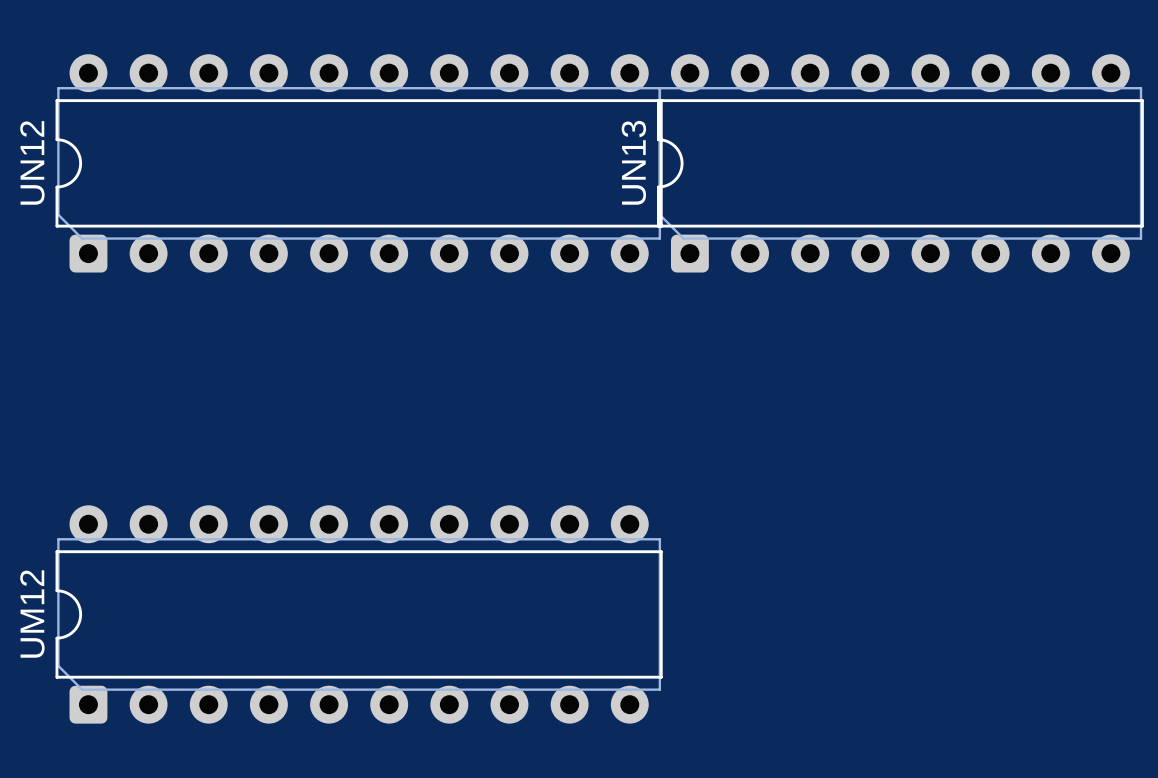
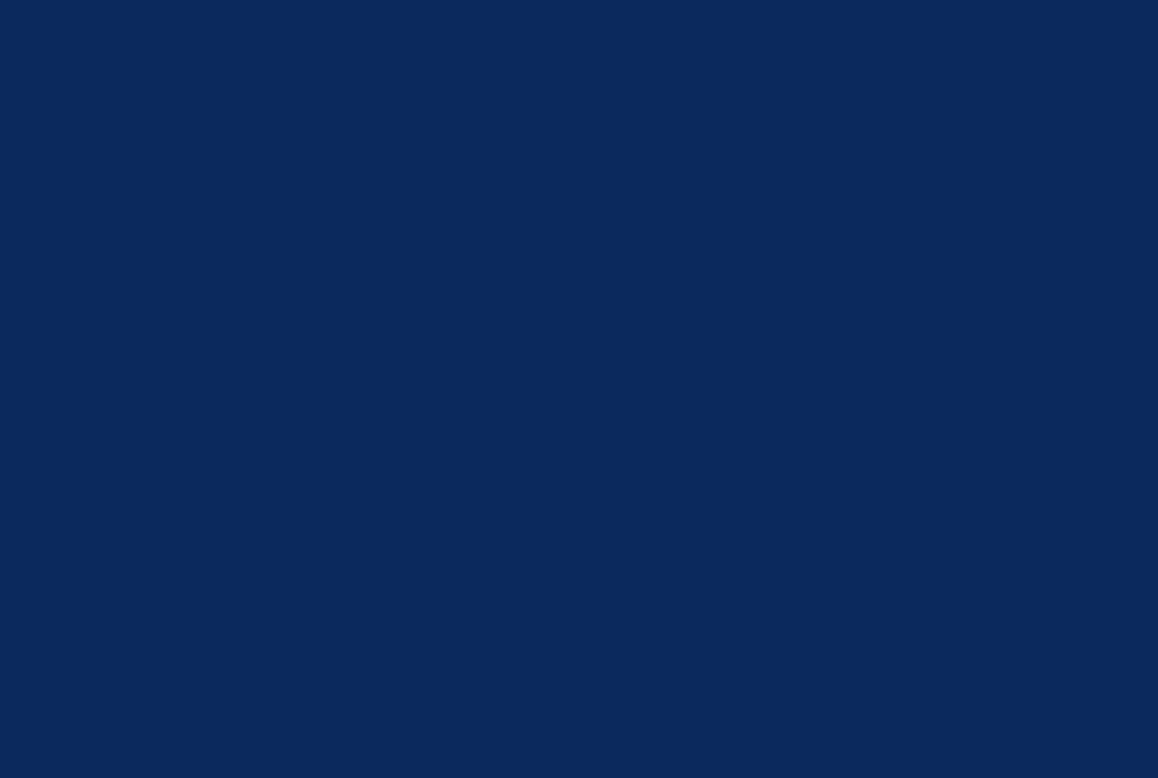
UN12: (359, 163) -> none
UN13: (900, 163) -> none
UM12: (359, 614) -> none

